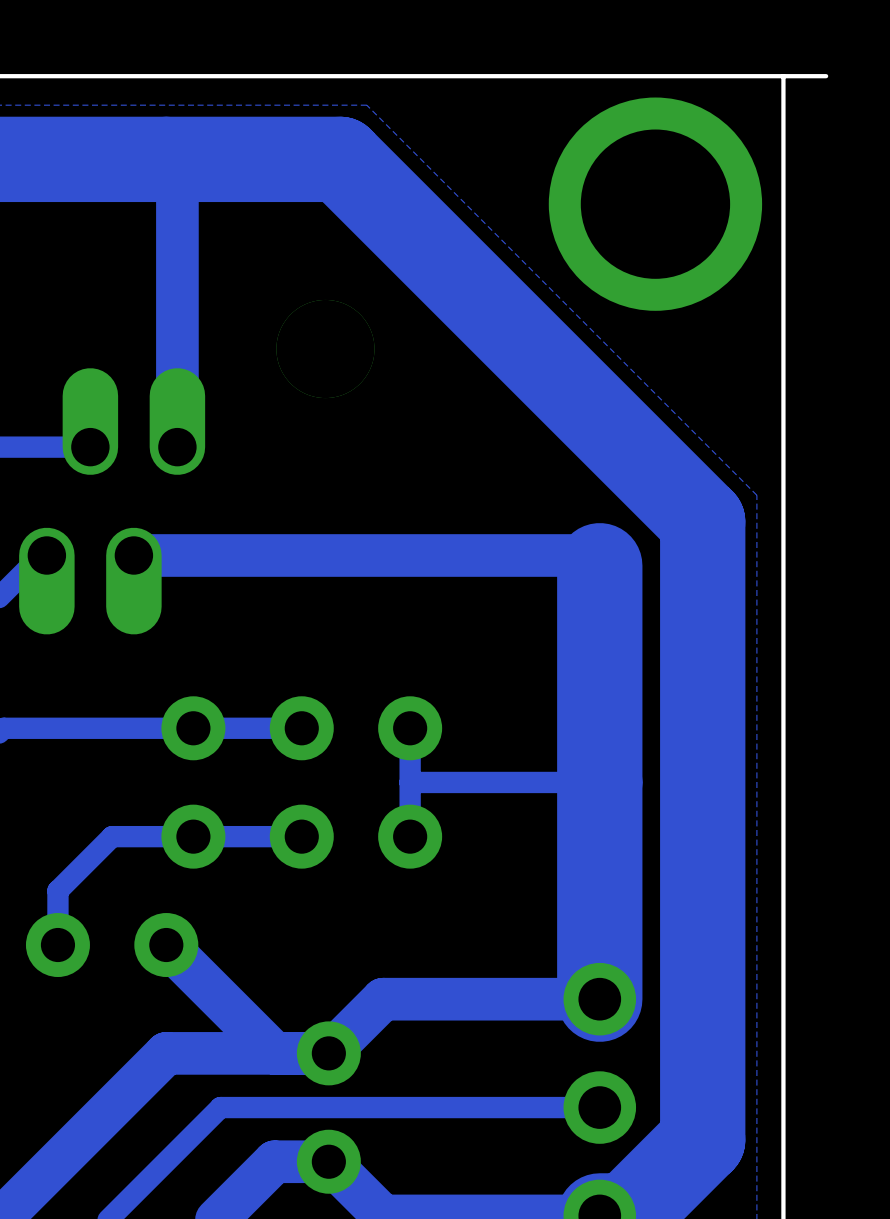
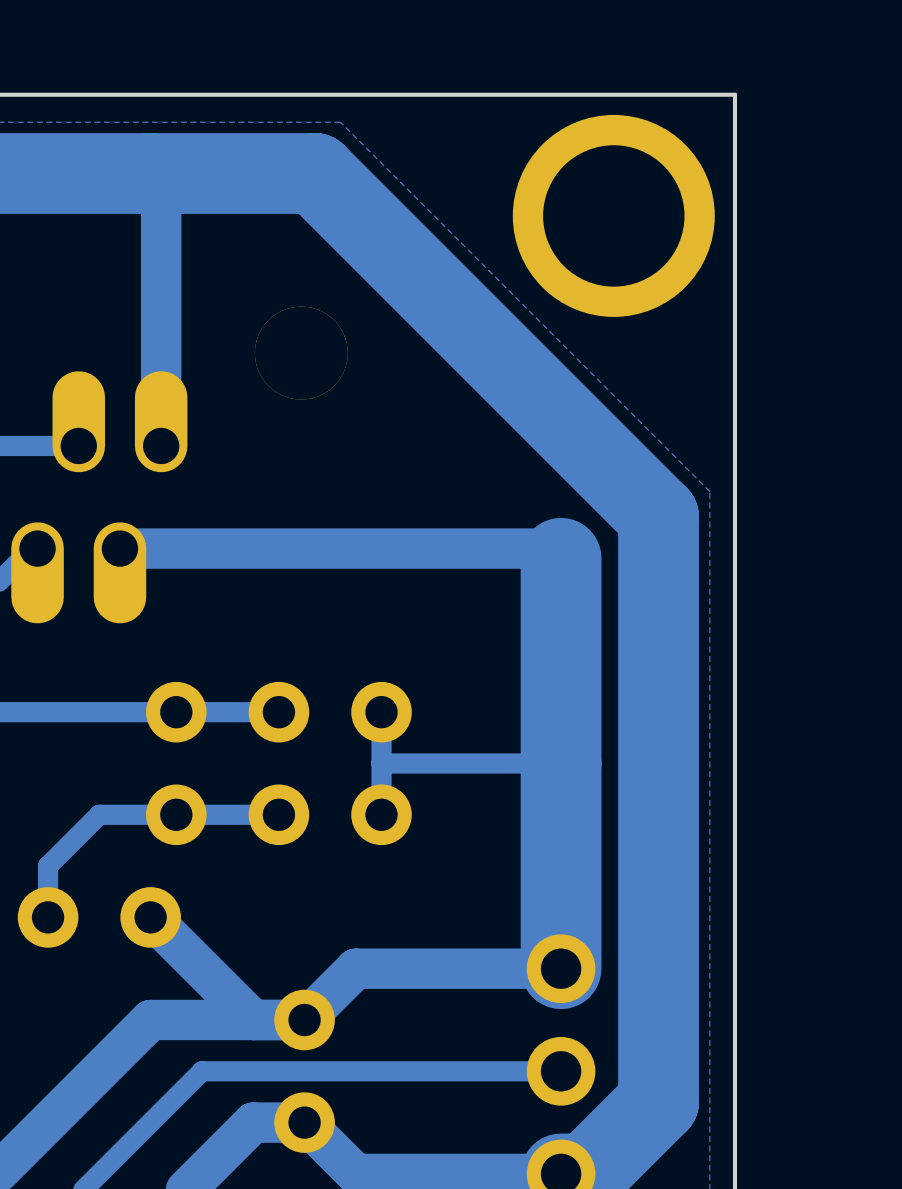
board edge: (826, 76) (783, 76) -> none

